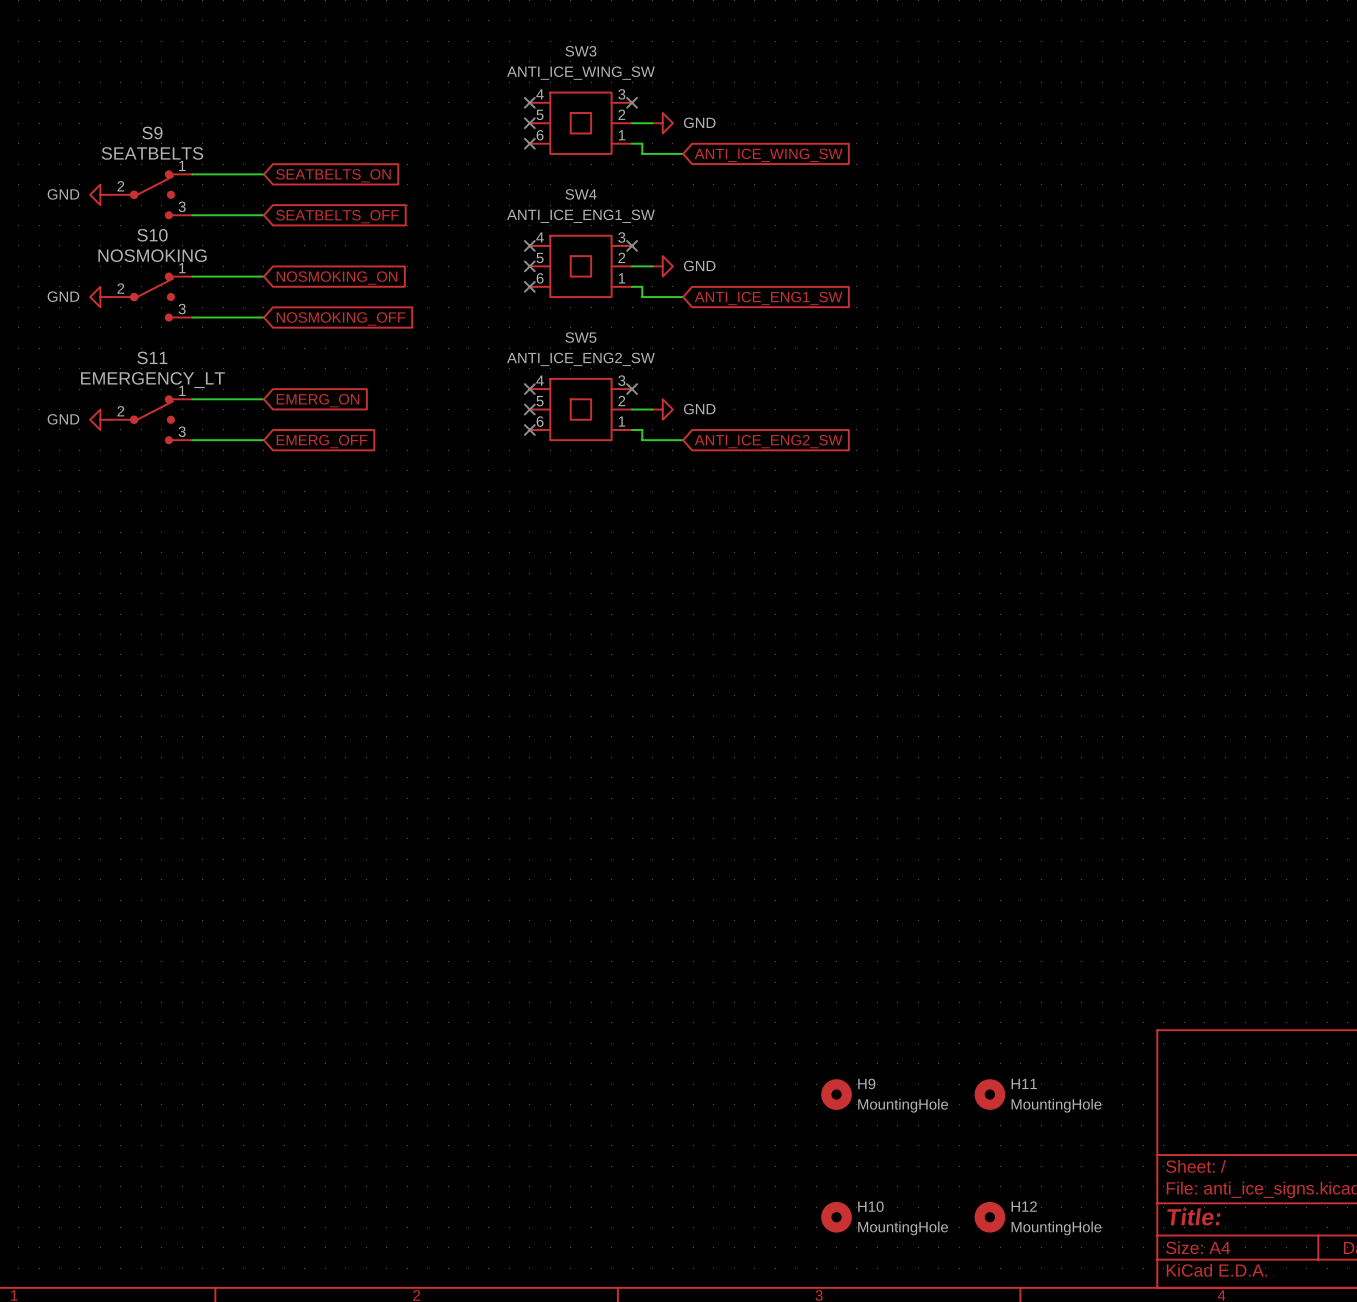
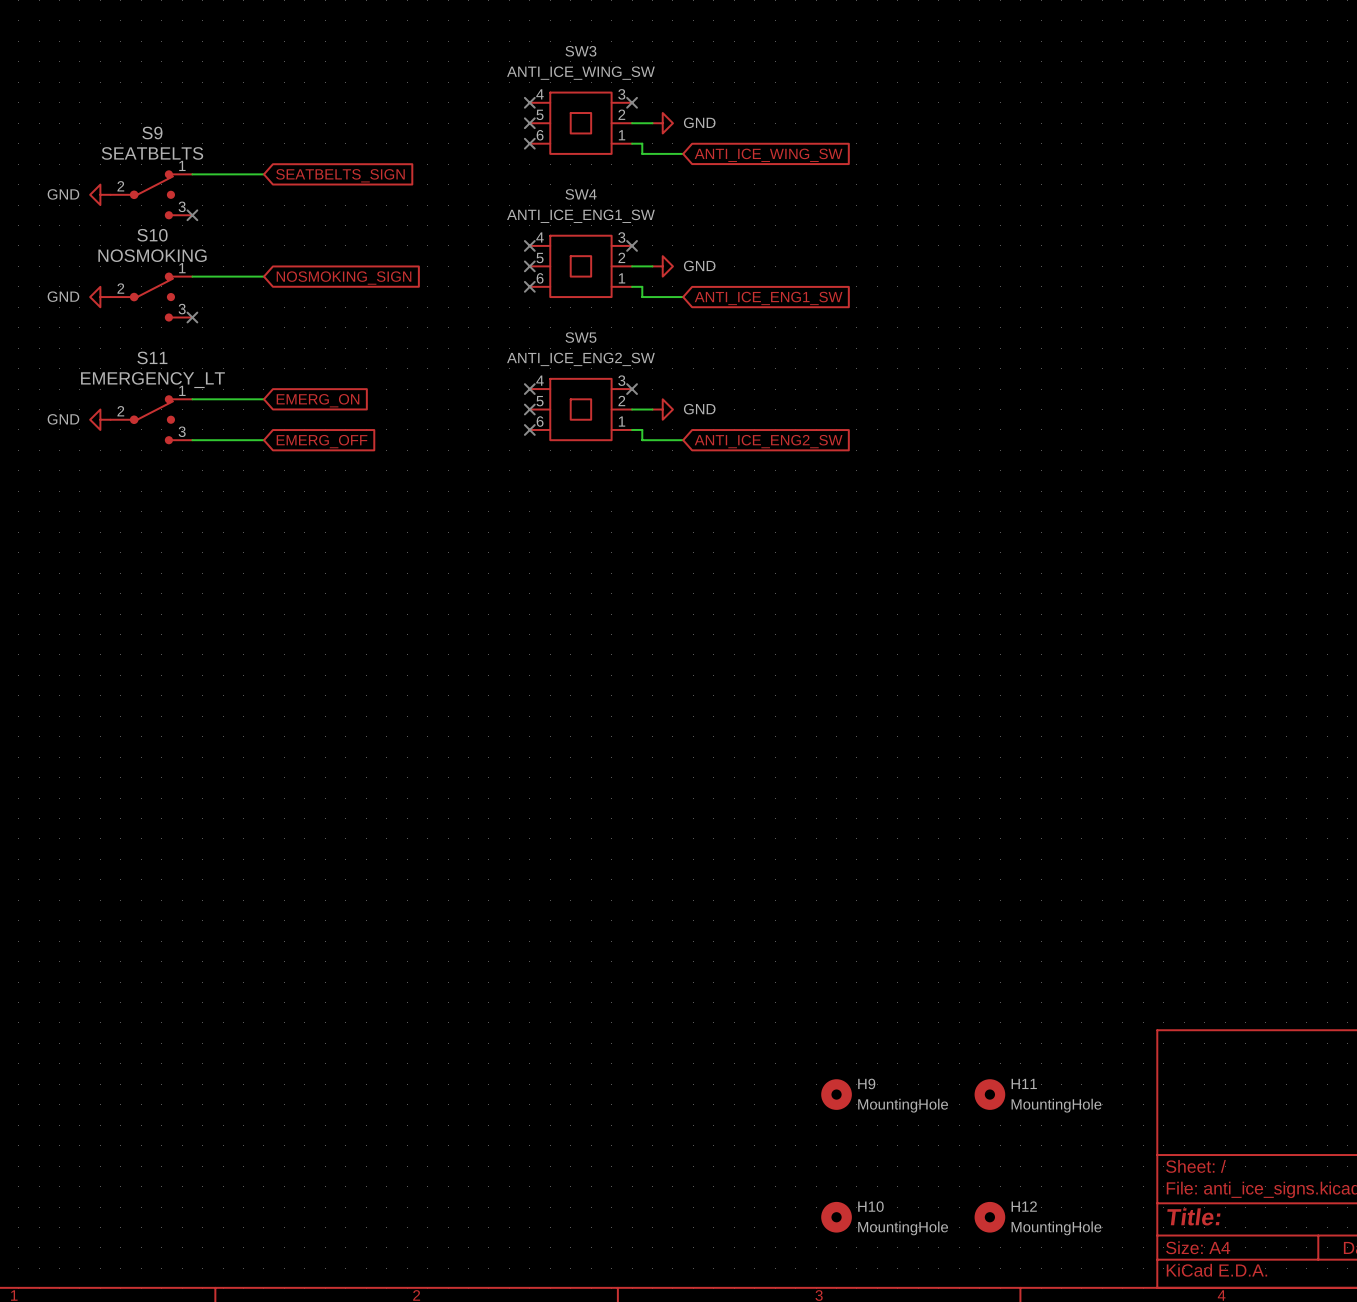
global label: SEATBELTS_ON (333, 175) -> SEATBELTS_SIGN (340, 175)
wire: (192, 215) (263, 215) -> none
no-connect mark: none -> (192, 215)
global label: SEATBELTS_OFF (337, 216) -> none
global label: NOSMOKING_ON (337, 278) -> NOSMOKING_SIGN (344, 278)
wire: (192, 317) (263, 317) -> none
no-connect mark: none -> (192, 317)
global label: NOSMOKING_OFF (341, 318) -> none

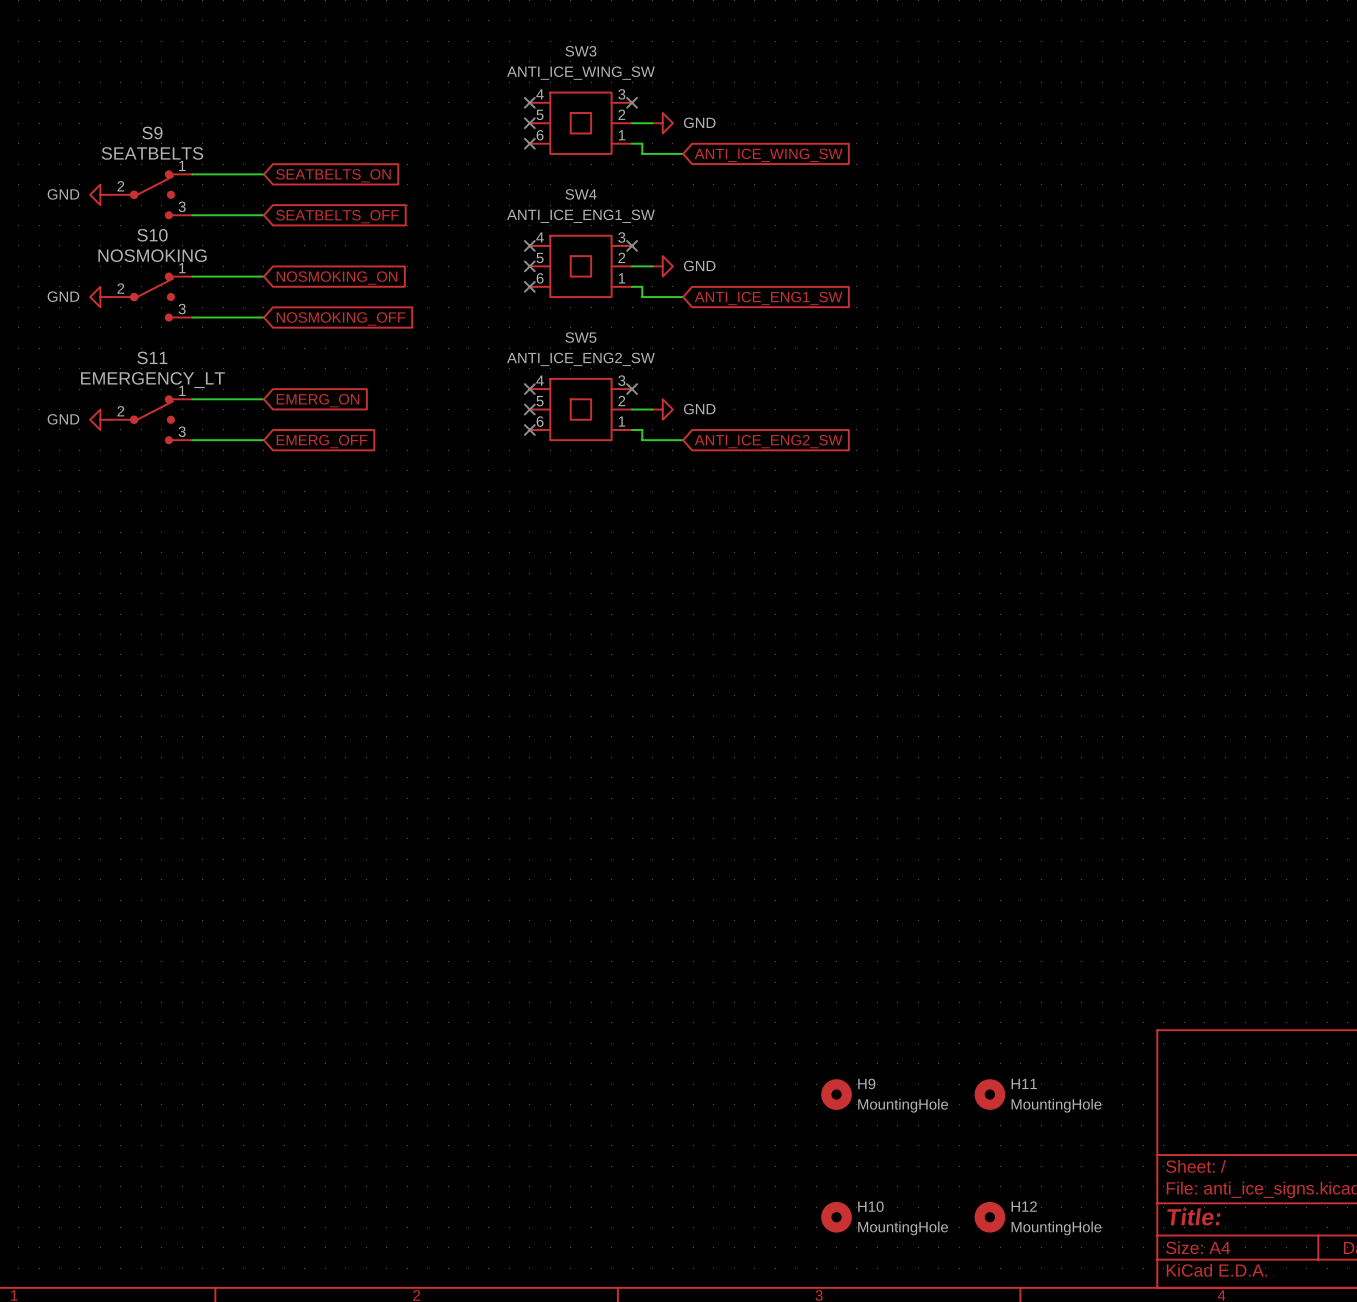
global label: SEATBELTS_SIGN (340, 175) -> SEATBELTS_ON (333, 175)
wire: none -> (192, 215) (263, 215)
no-connect mark: (192, 215) -> none
global label: none -> SEATBELTS_OFF (337, 216)
global label: NOSMOKING_SIGN (344, 278) -> NOSMOKING_ON (337, 278)
wire: none -> (192, 317) (263, 317)
no-connect mark: (192, 317) -> none
global label: none -> NOSMOKING_OFF (341, 318)

